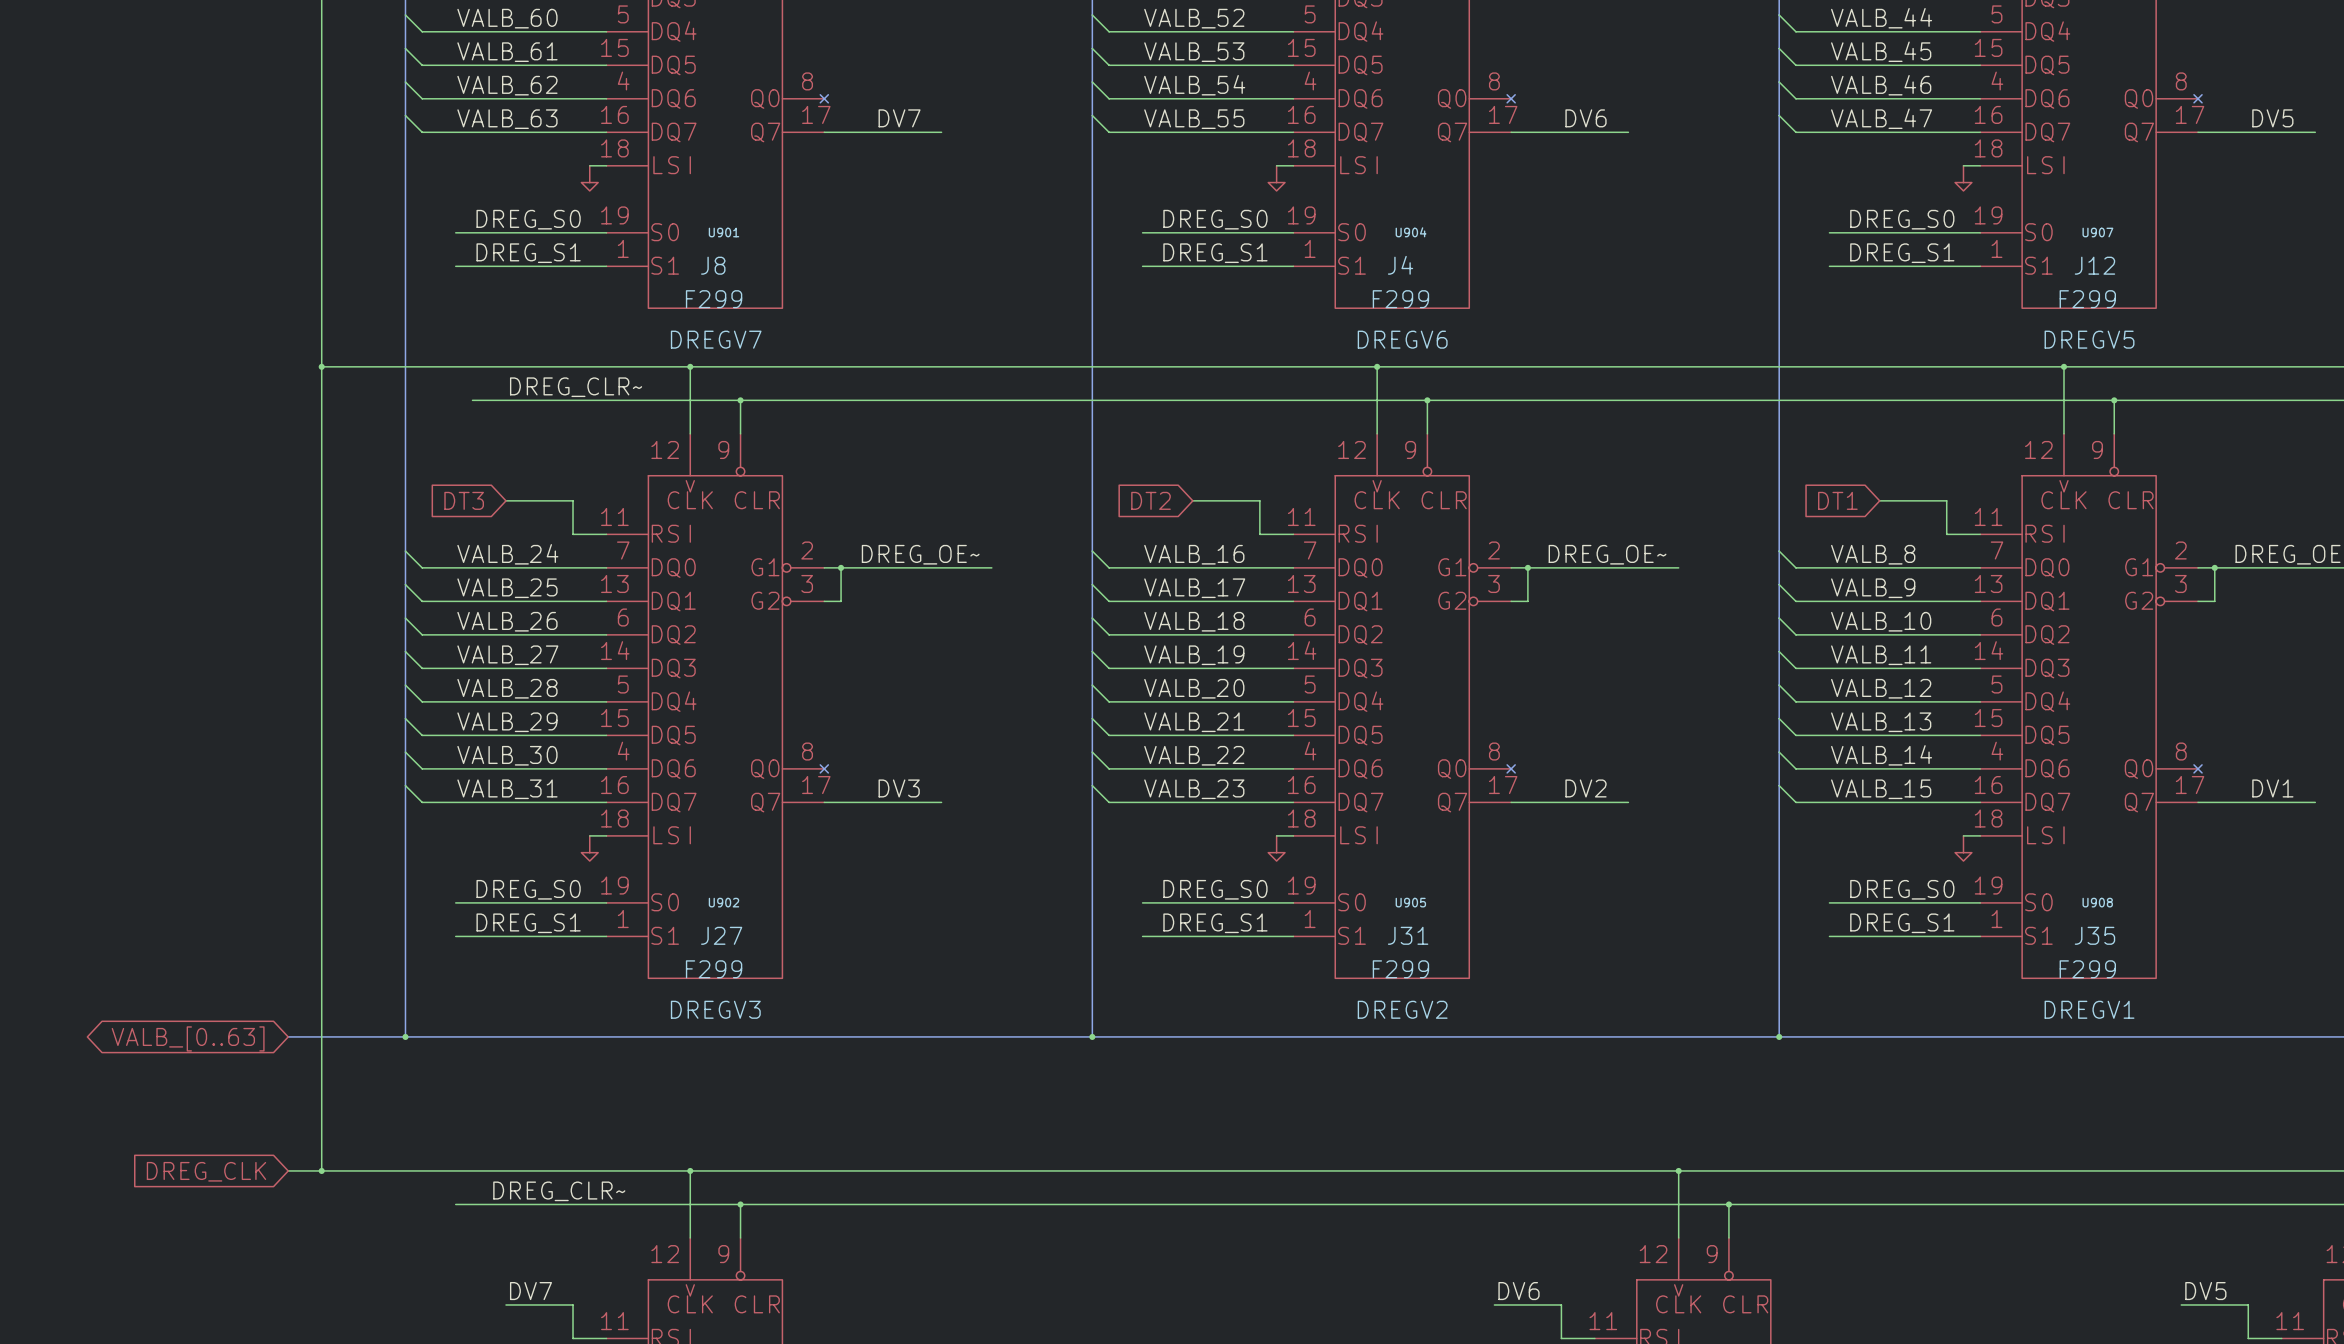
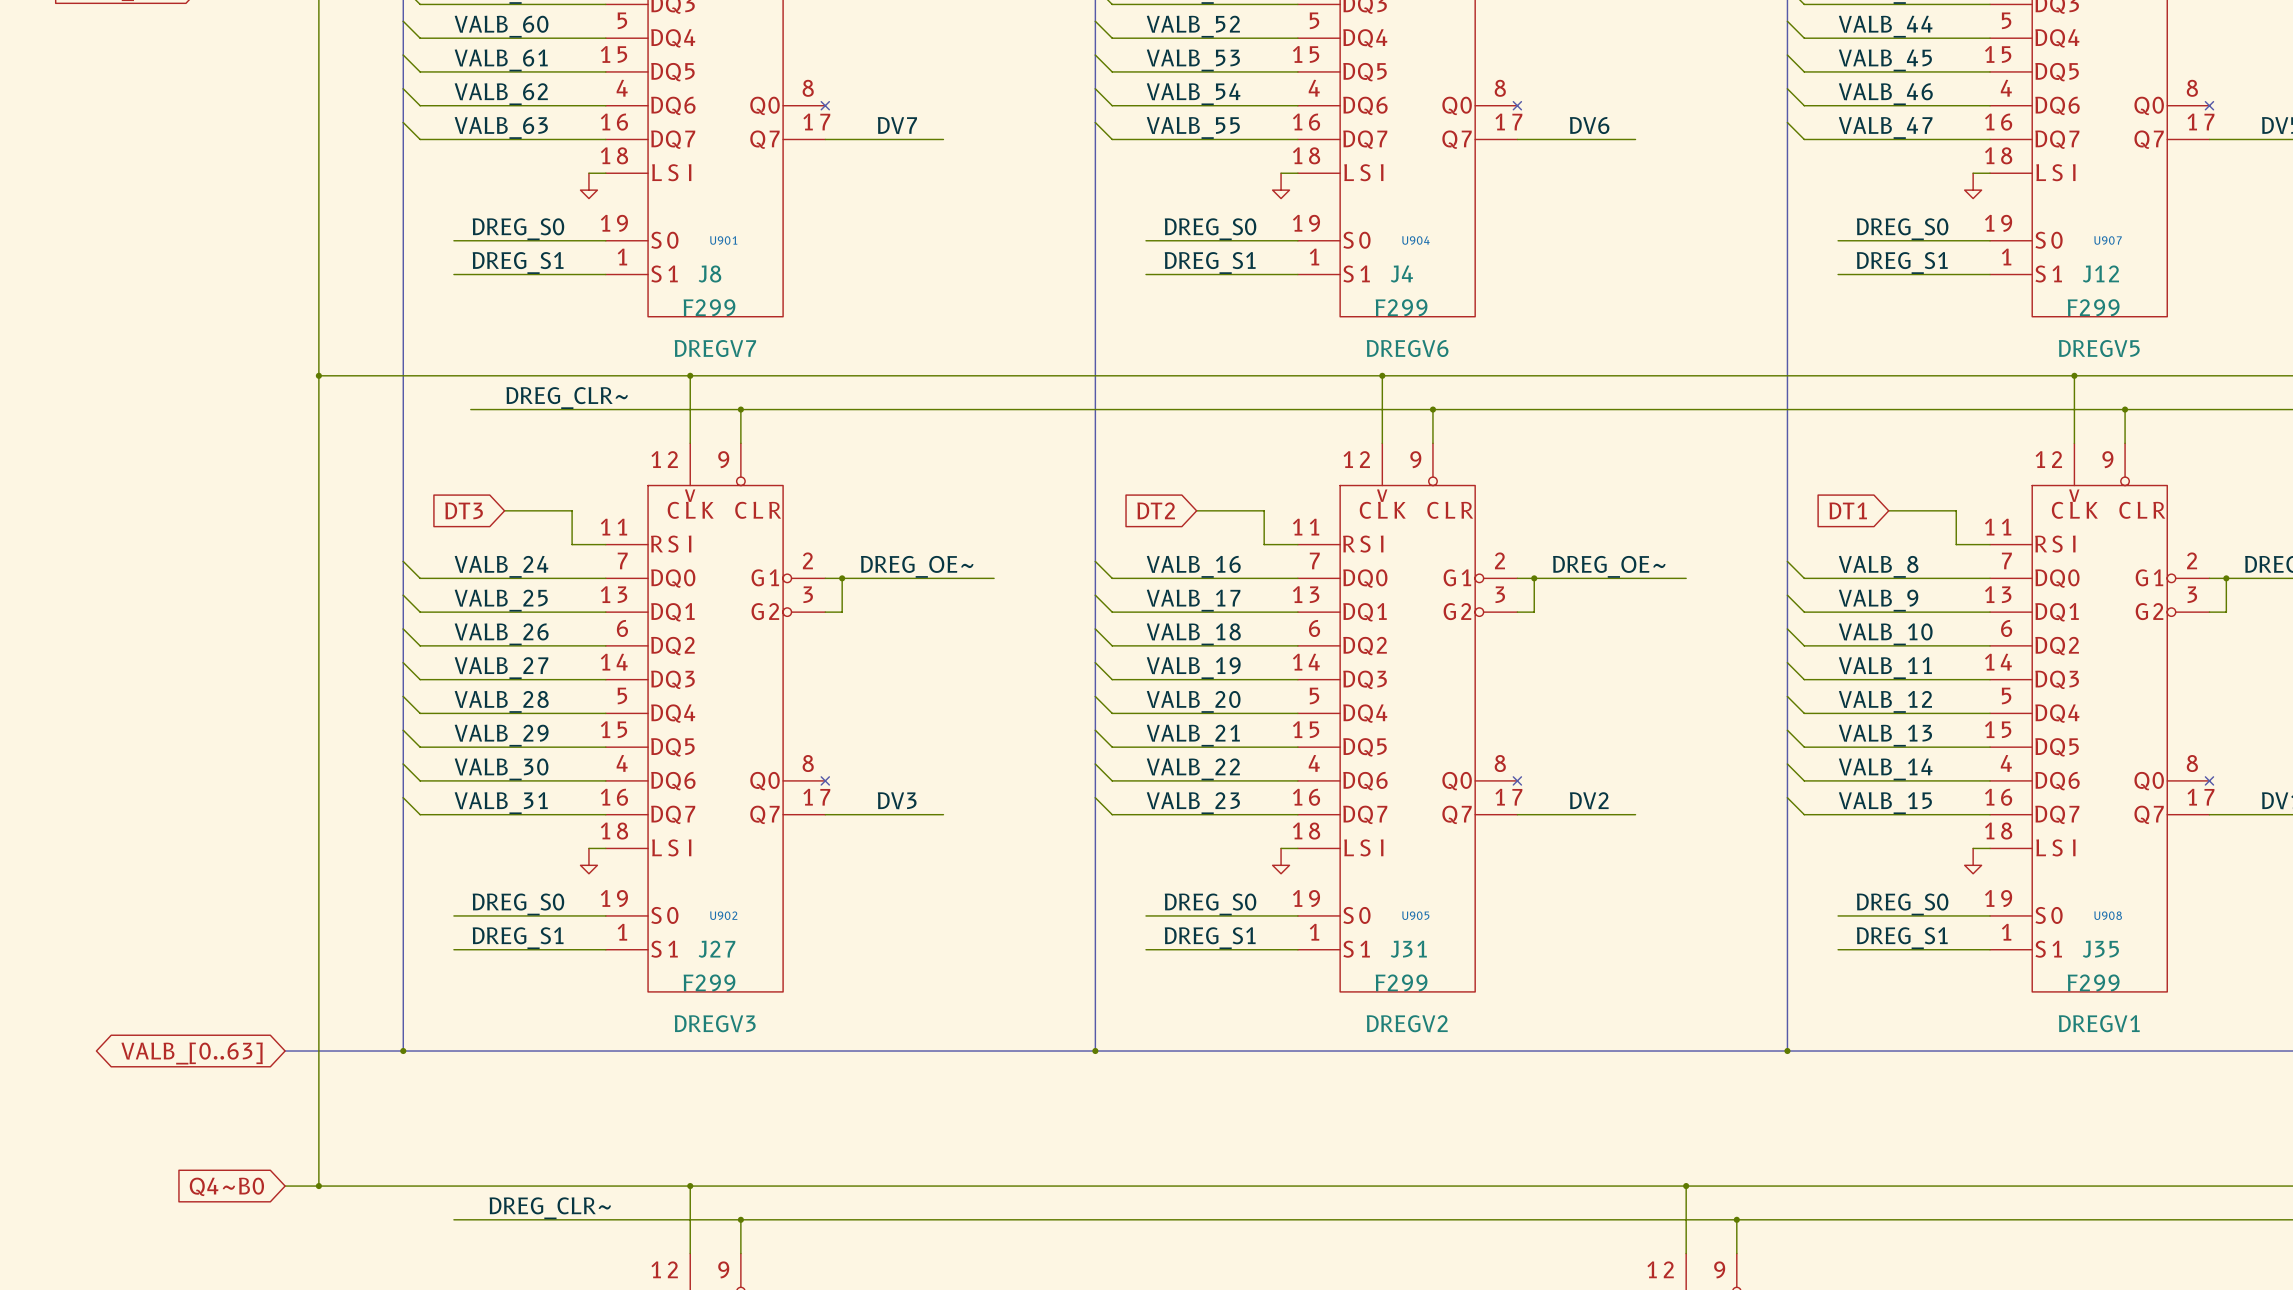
global label: DREG_CLK (206, 1171) -> Q4~B0 (226, 1186)

